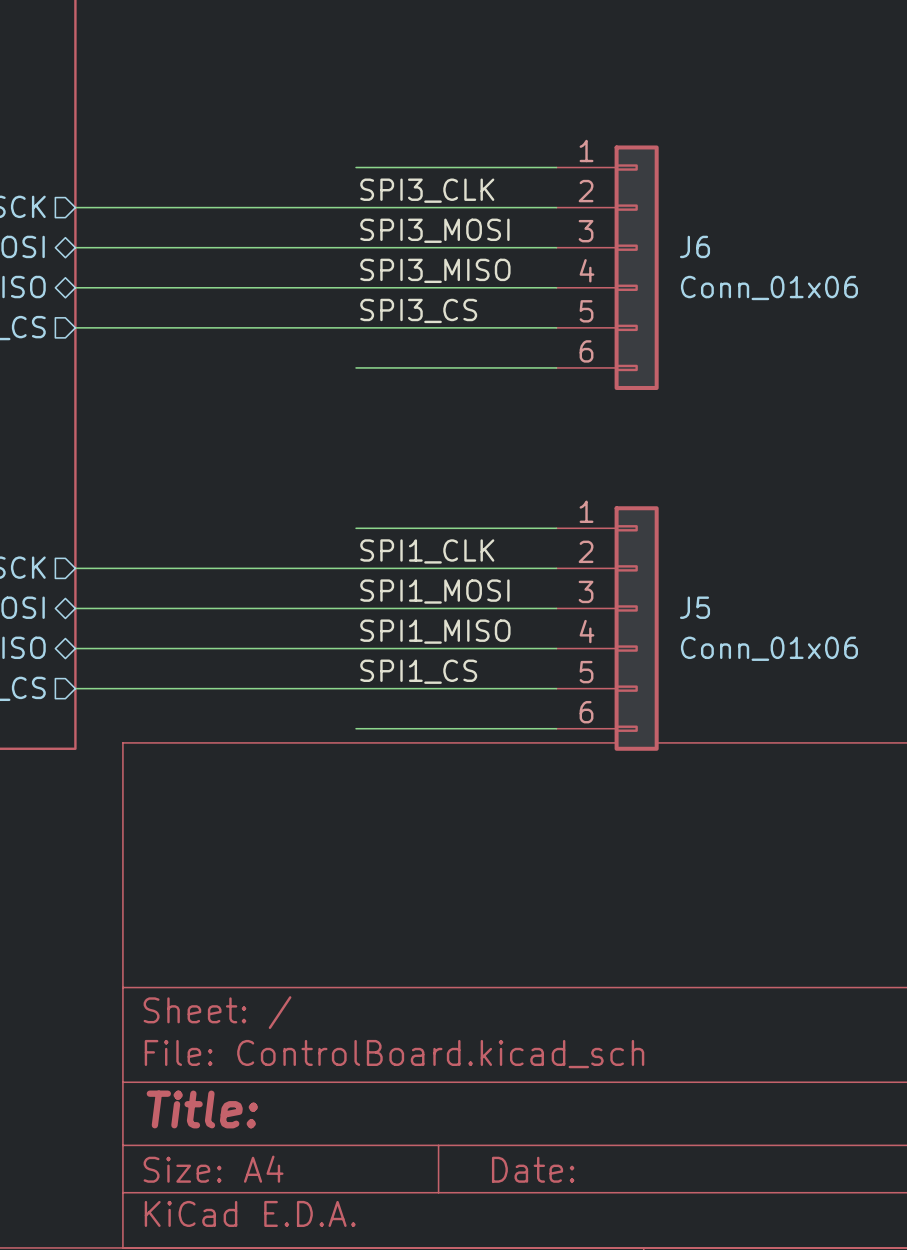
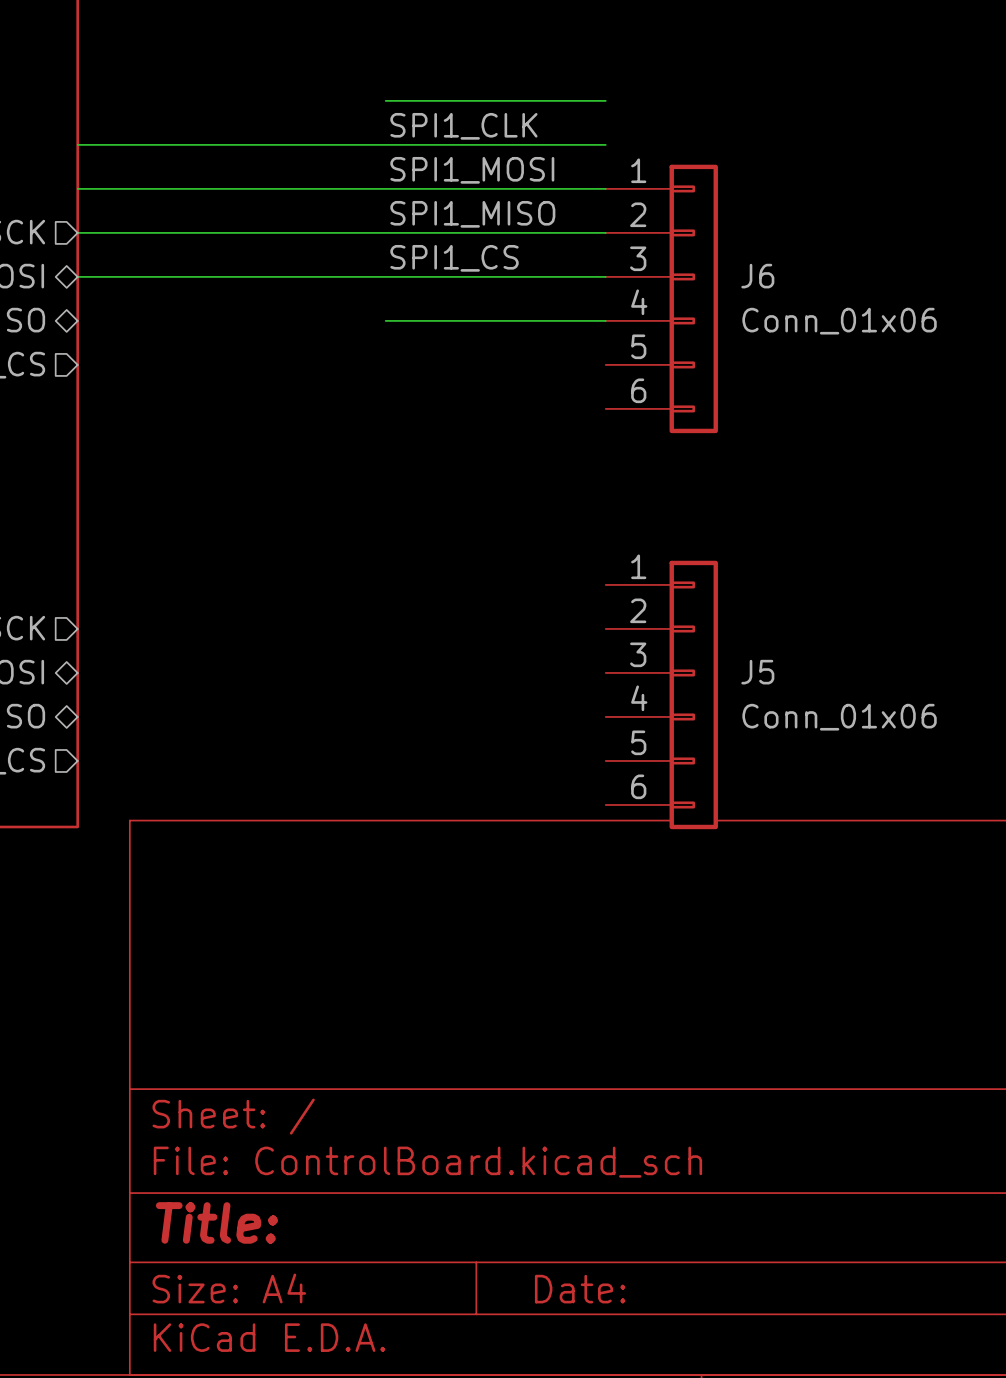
label: none -> SPI1_CLK (463, 126)
label: none -> SPI1_MOSI (472, 170)
label: SPI3_CLK (427, 190) -> SPI1_MISO (472, 214)
label: SPI3_MOSI (434, 230) -> SPI1_CS (454, 258)
label: SPI3_MISO (435, 270) -> none
wire: (75, 287) (356, 287) -> (77, 188) (385, 188)
label: SPI3_CS (418, 310) -> none
wire: (75, 327) (556, 327) -> (77, 144) (605, 144)
wire: (356, 367) (556, 367) -> (385, 100) (605, 100)
wire: (356, 528) (556, 528) -> none
label: SPI1_CLK (427, 551) -> none
wire: (75, 568) (556, 568) -> none
label: SPI1_MOSI (434, 591) -> none
wire: (75, 608) (556, 608) -> none
label: SPI1_MISO (435, 631) -> none
wire: (75, 648) (556, 648) -> none
label: SPI1_CS (418, 671) -> none
wire: (75, 688) (556, 688) -> none
wire: (356, 728) (556, 728) -> none

